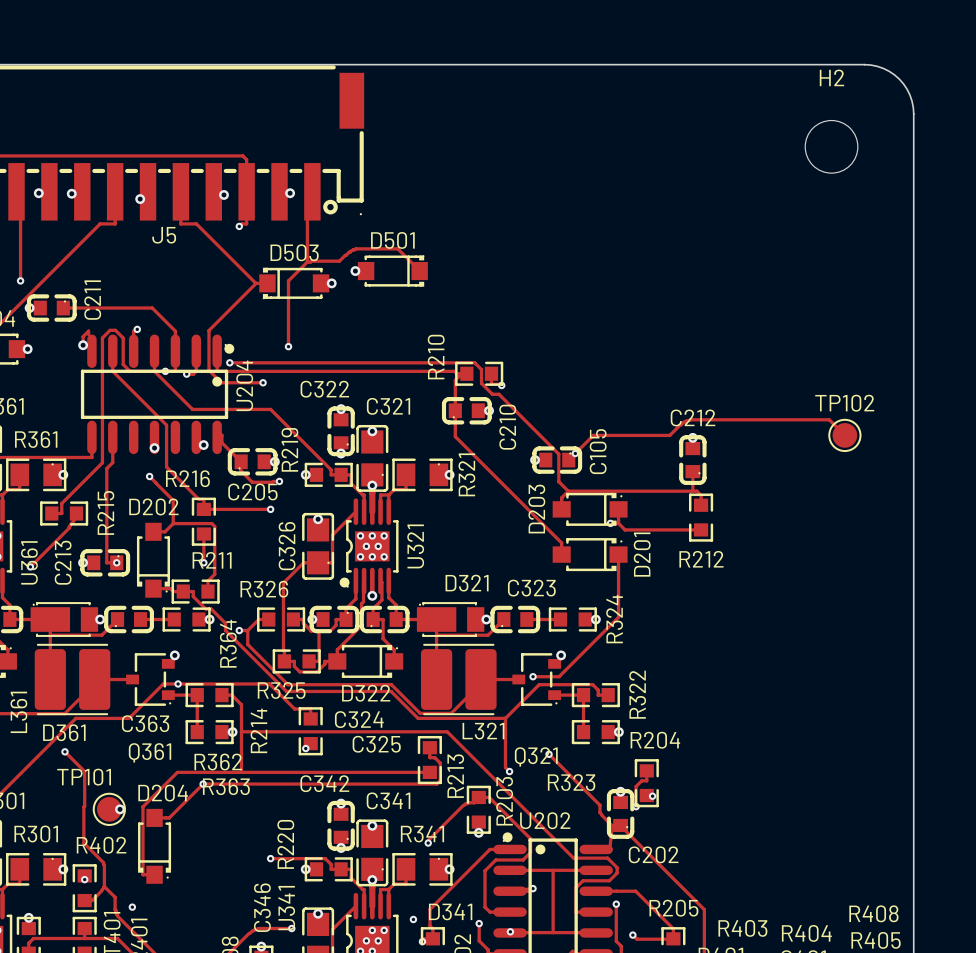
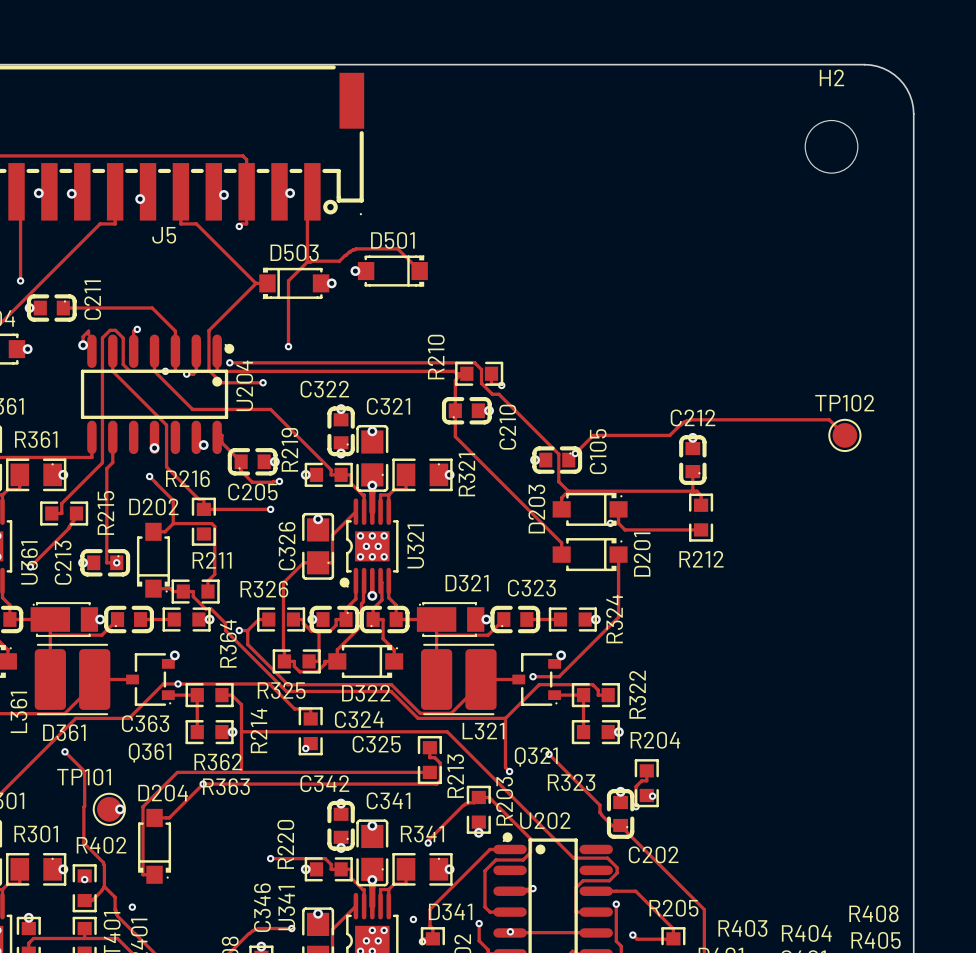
track: (203, 534) (203, 562) -> none
via: (203, 562) -> none
track: (612, 825) (609, 848) -> none
track: (510, 870) (596, 870) -> none
track: (553, 870) (553, 932) -> none

